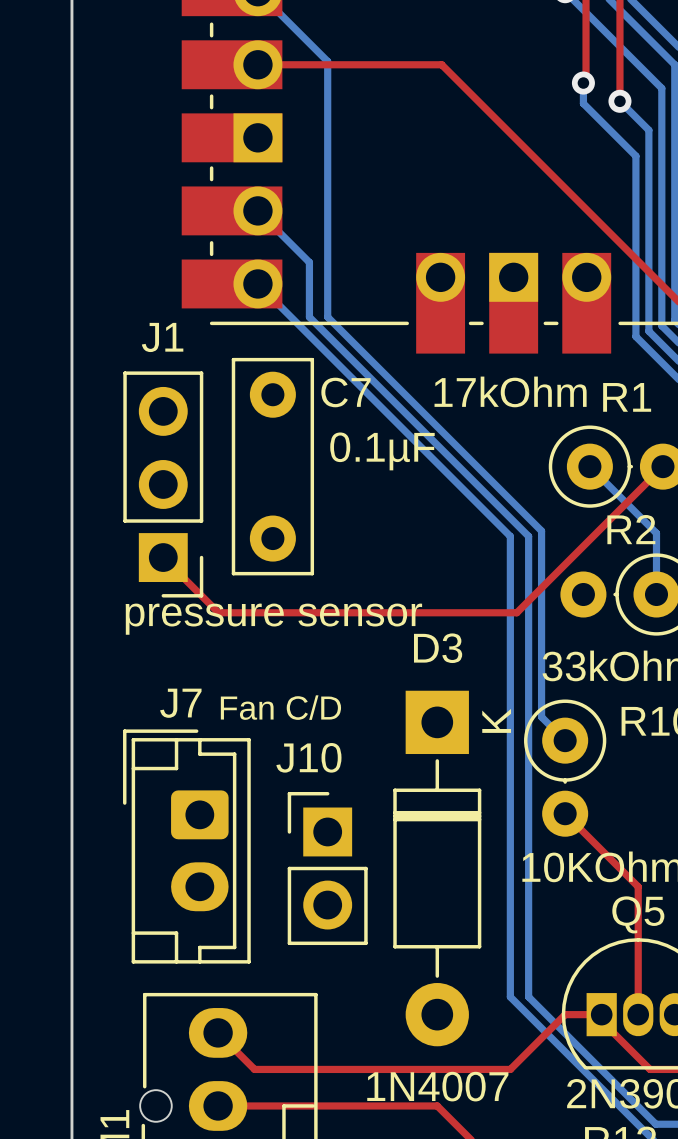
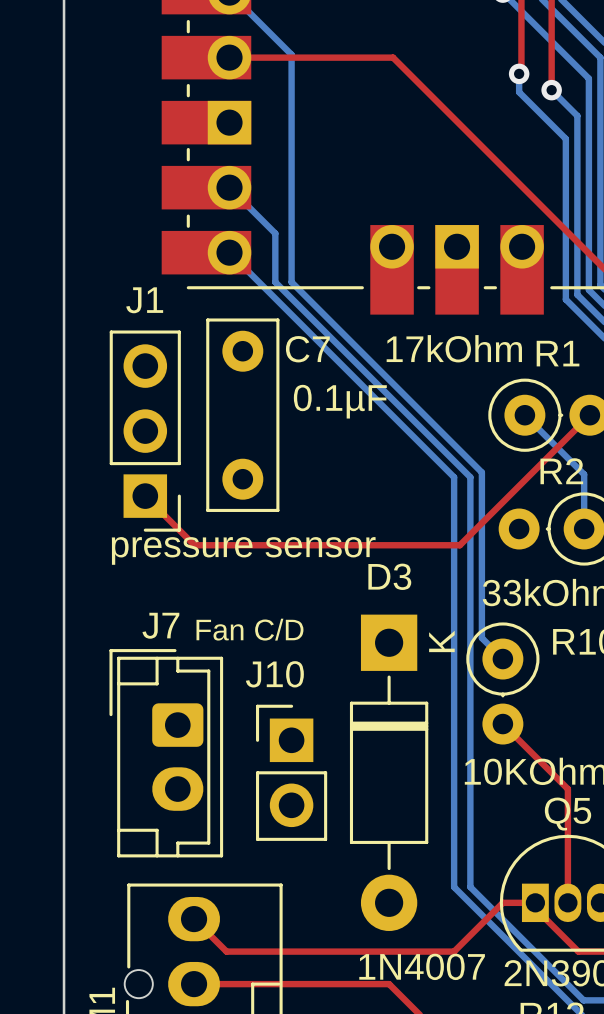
D3 value position: 1N4007 (437, 1086) -> 1N4007 (422, 966)

